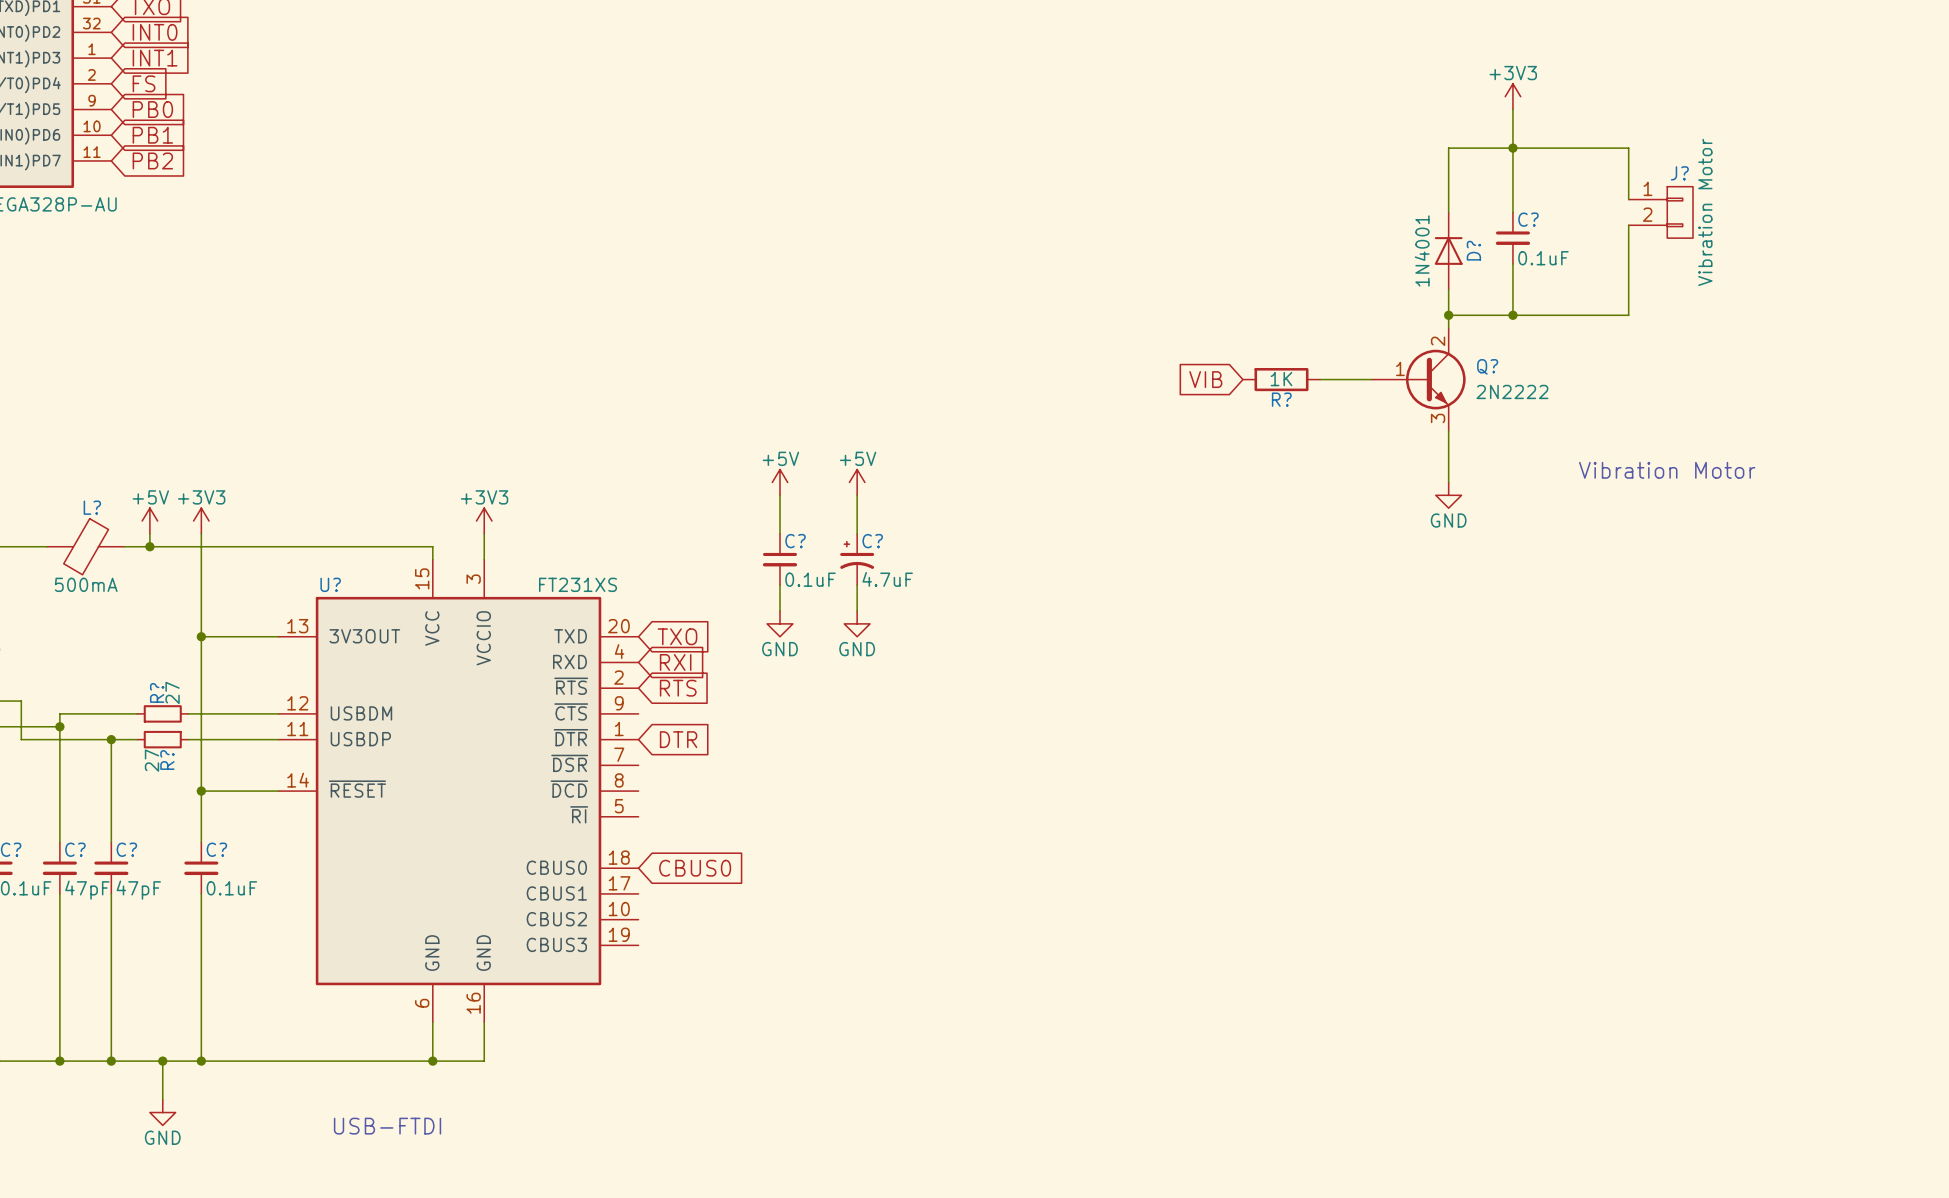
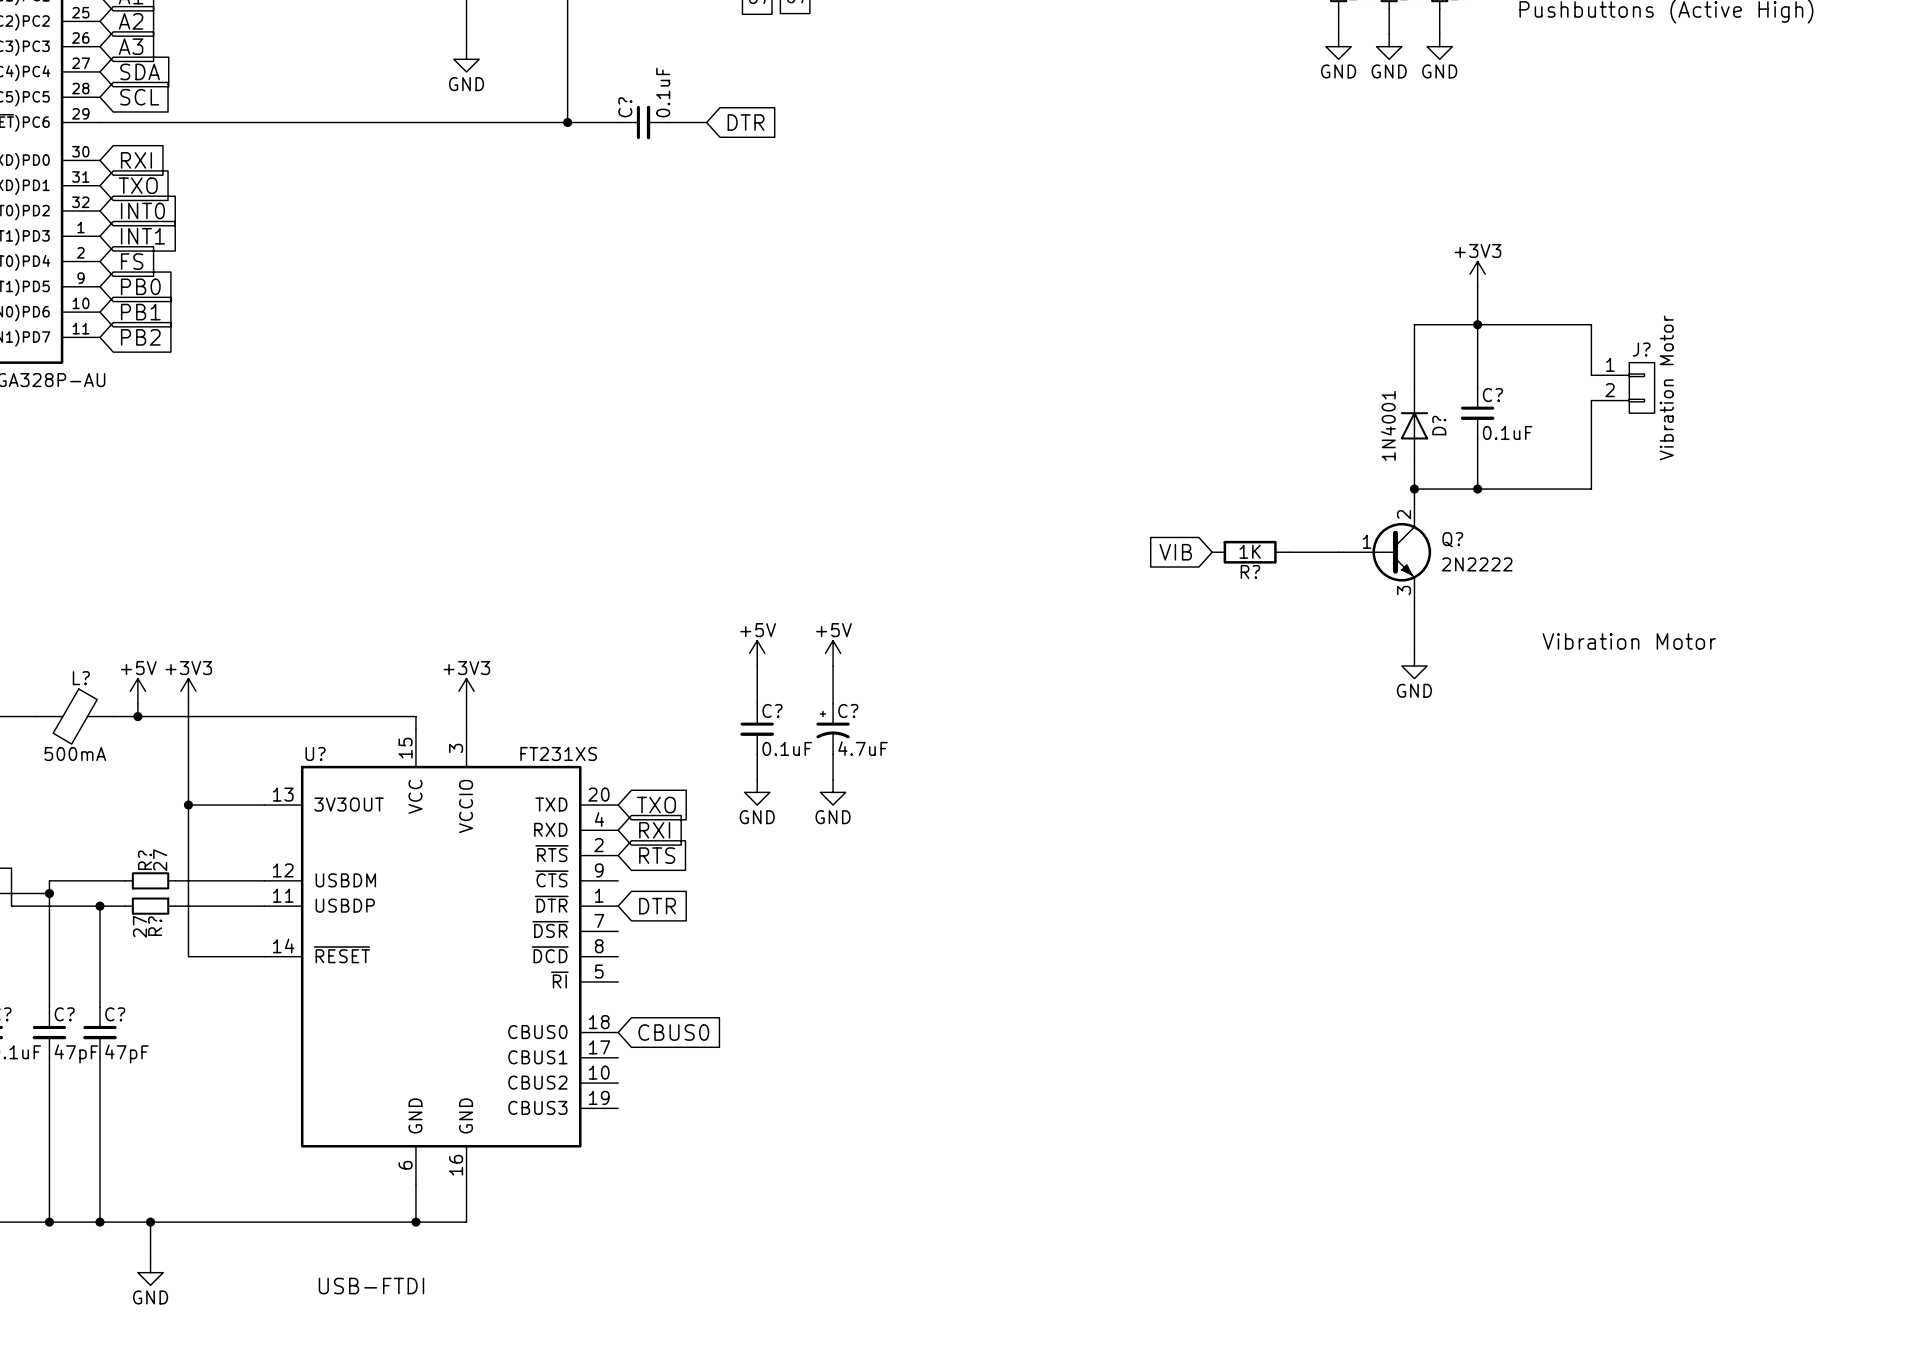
wire: (201, 791) (201, 842) -> none
junction: (201, 791) -> none
C?: 0.1uF (201, 868) -> none
wire: (201, 893) (201, 1061) -> none
junction: (201, 1061) -> none

